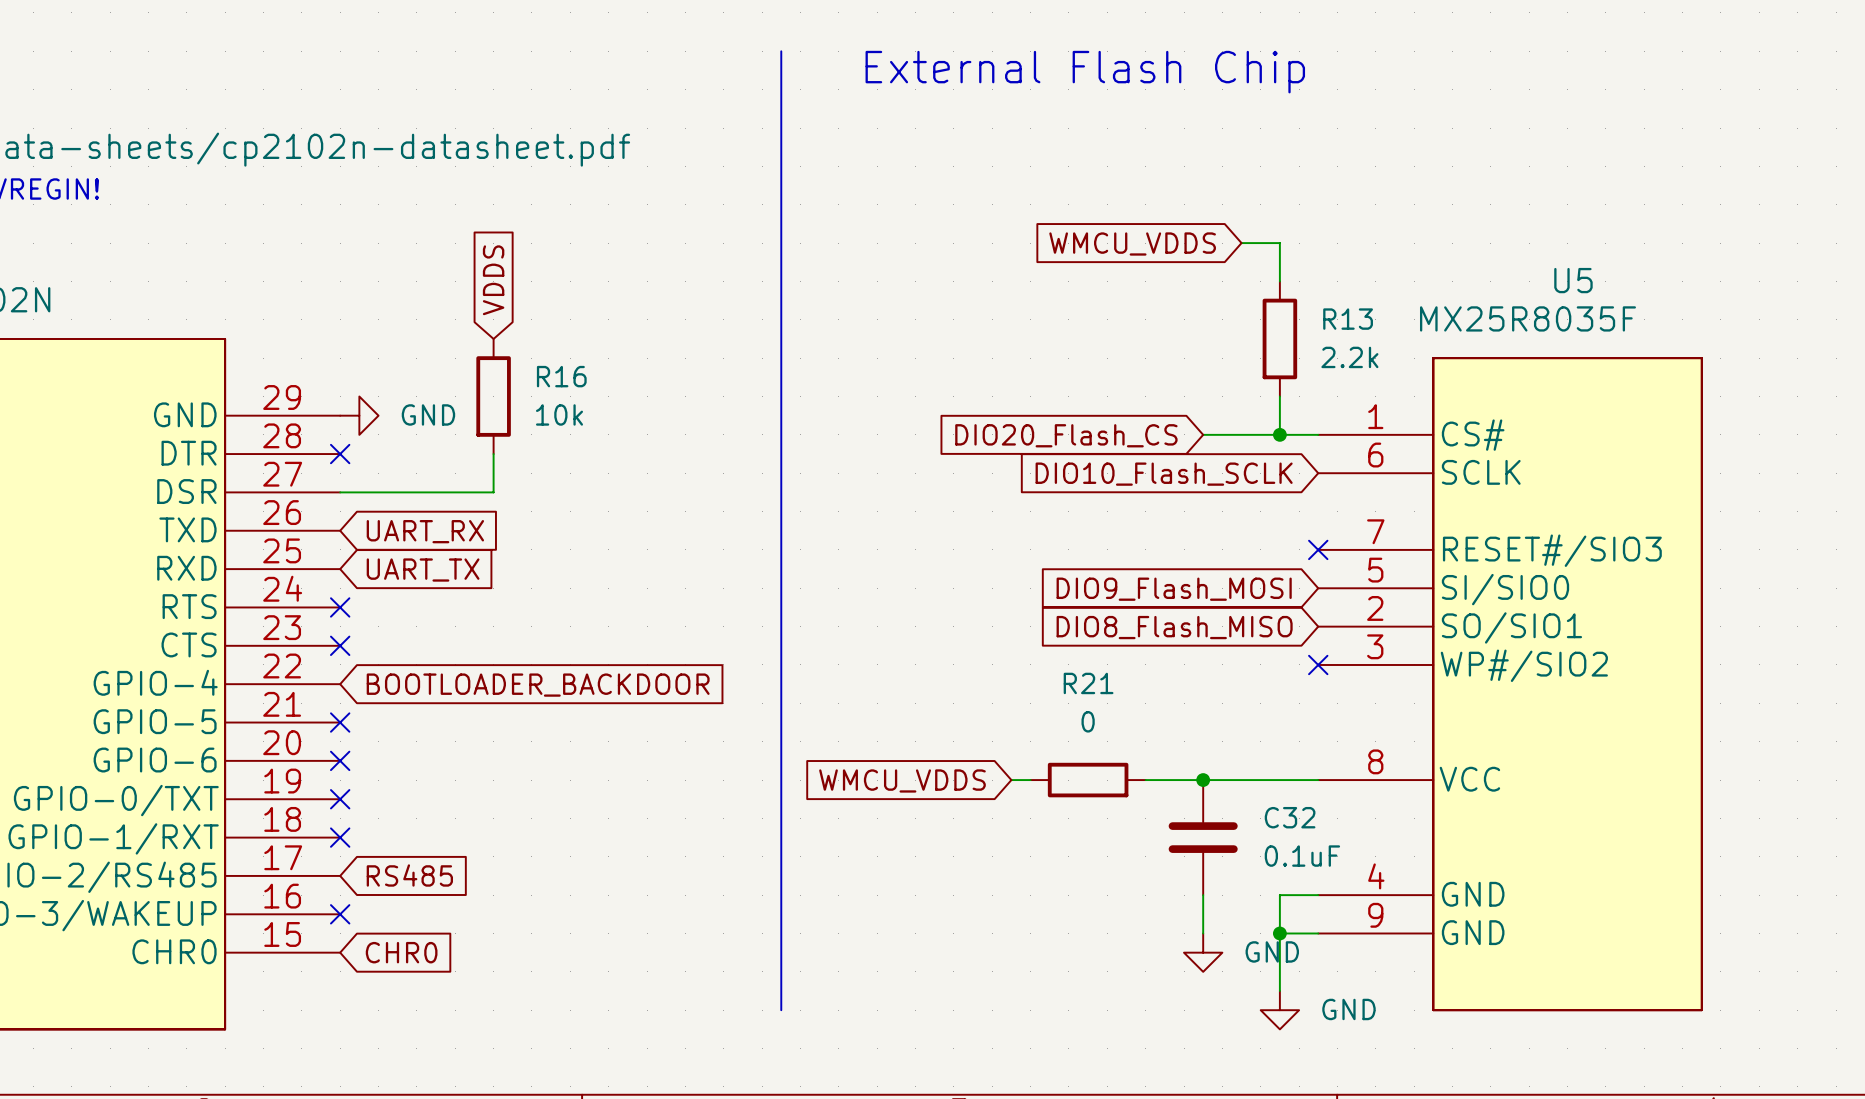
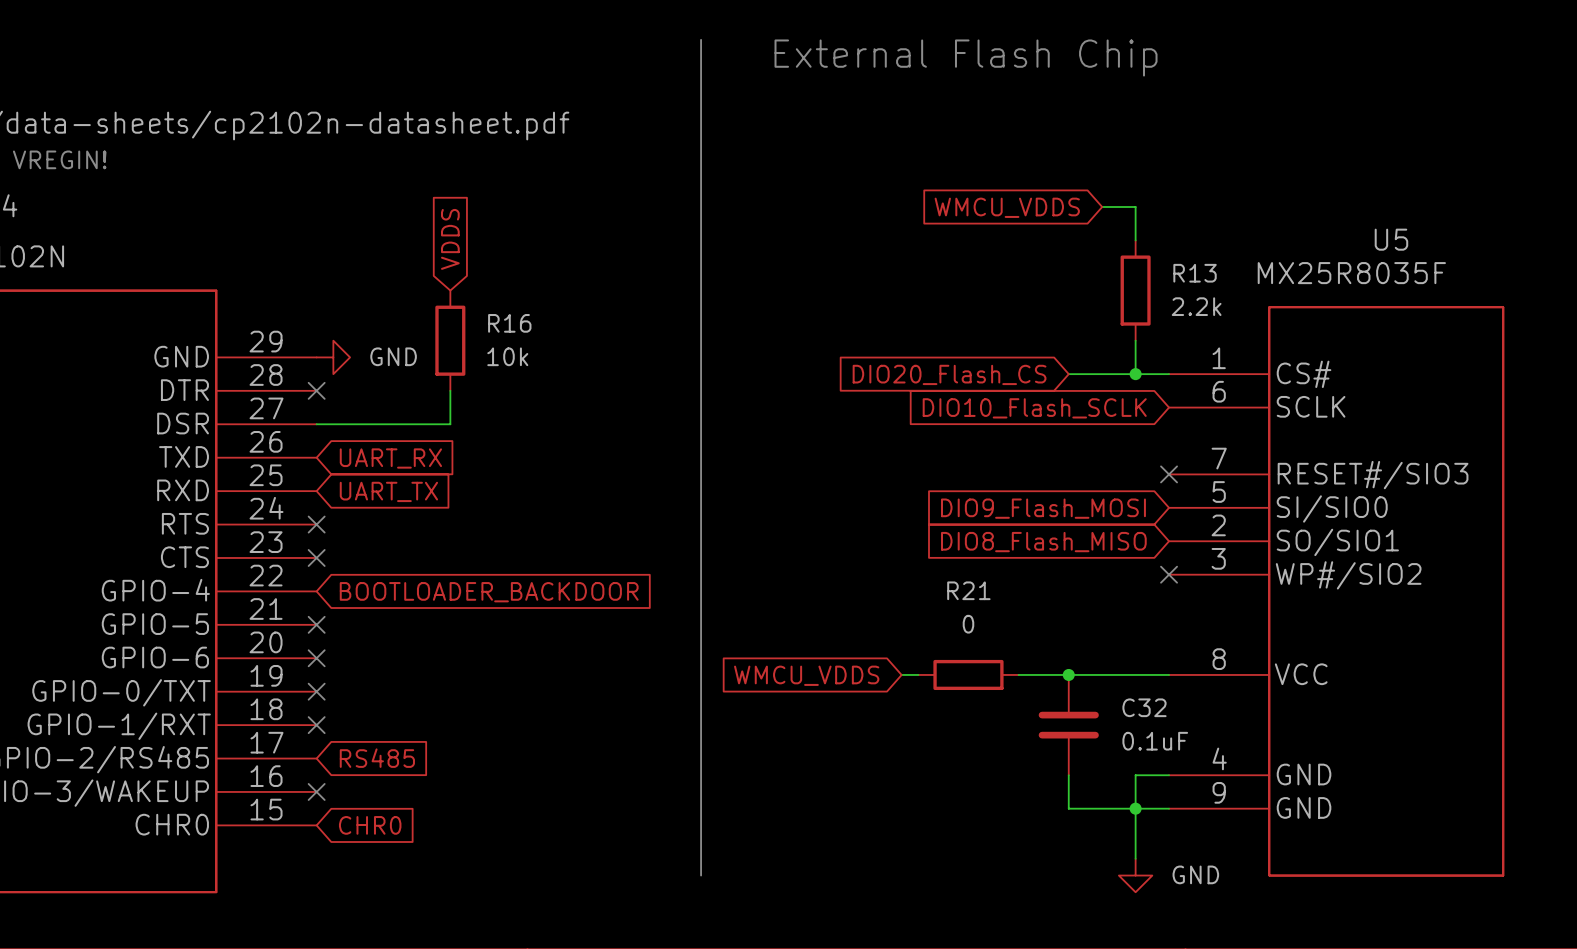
wire: none -> (1068, 808) (1135, 808)
power symbol: GND (1203, 952) -> none

